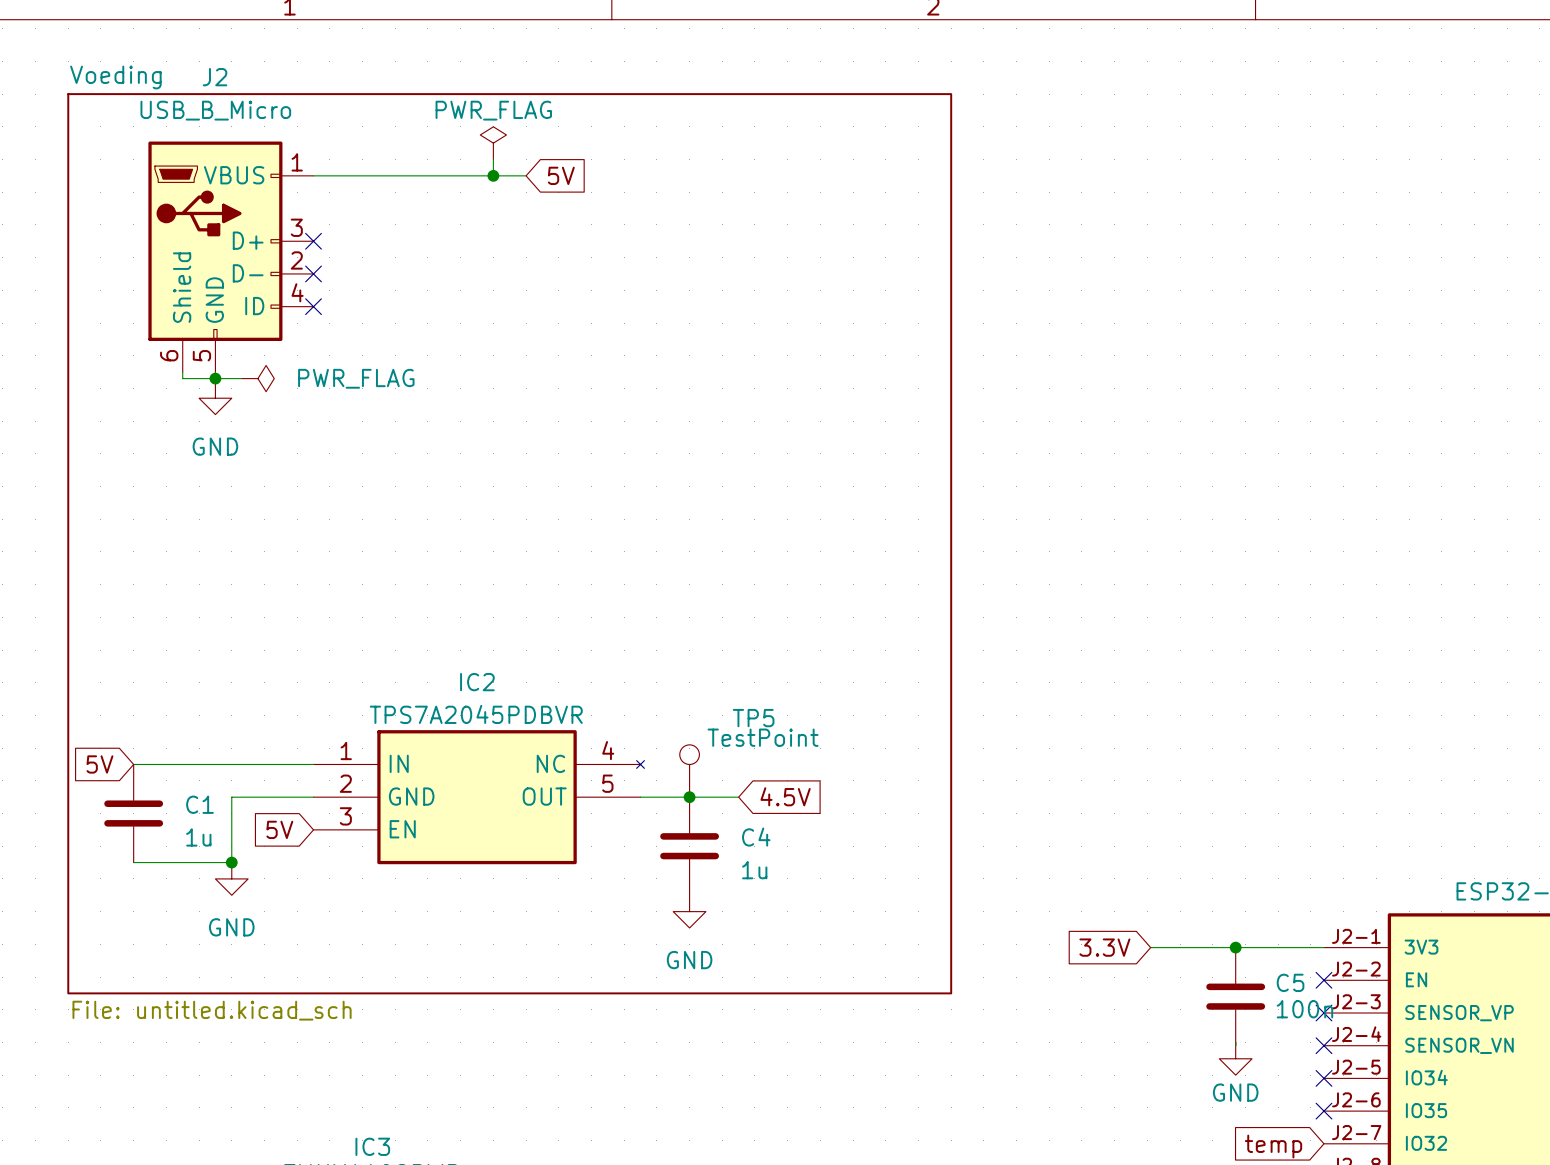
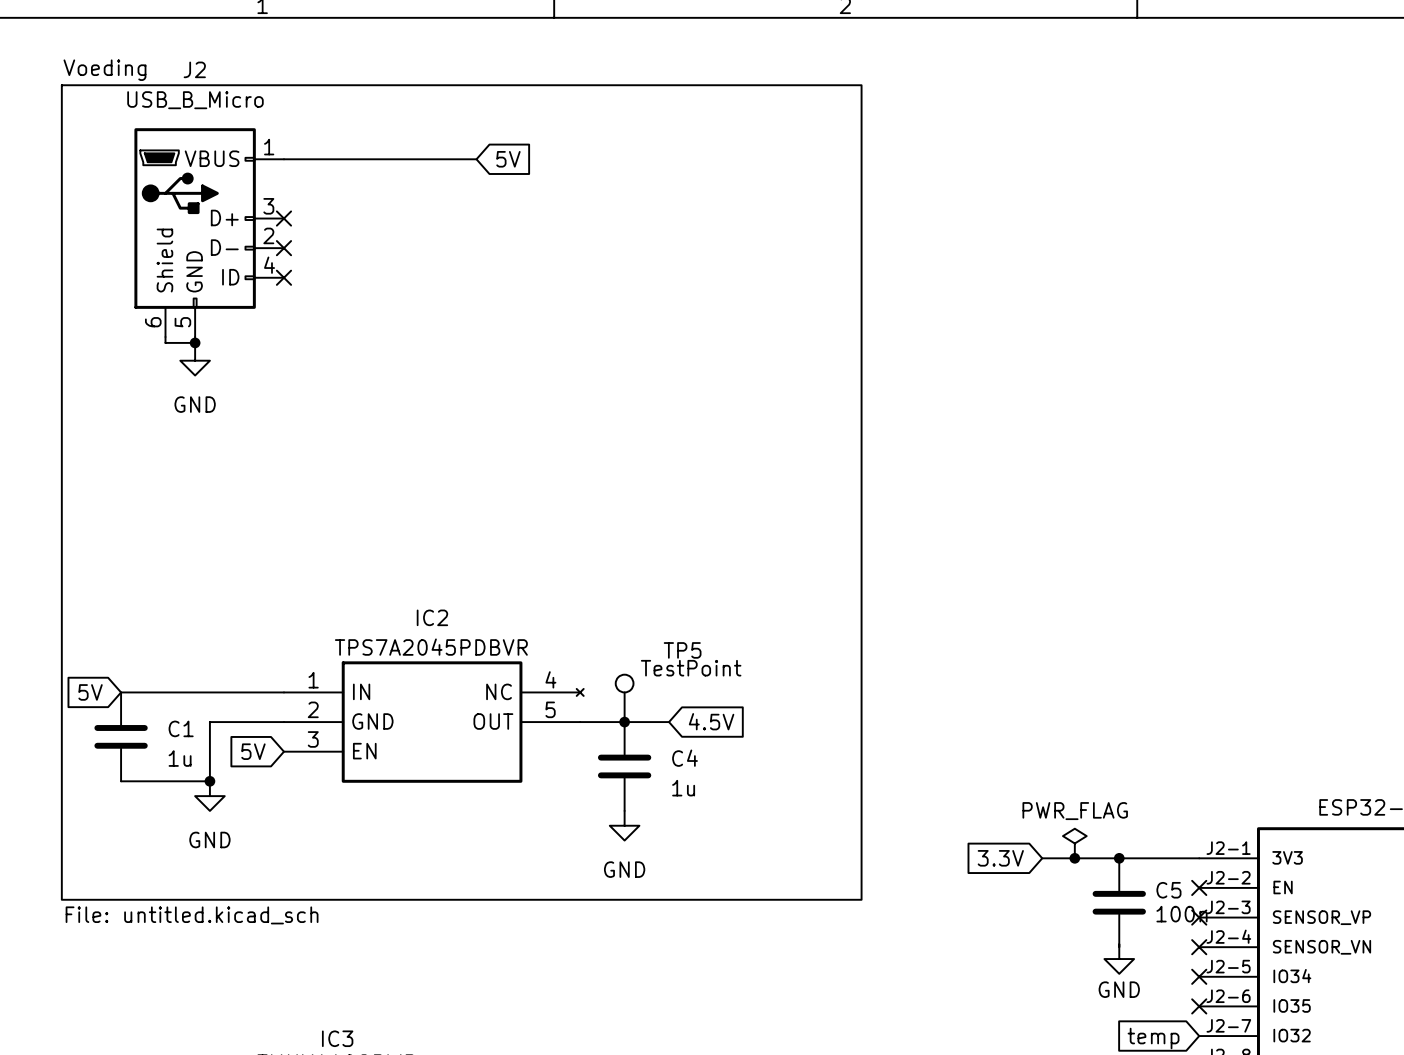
power symbol: PWR_FLAG (493, 143) -> none
wire: (493, 159) (493, 175) -> none
junction: (493, 175) -> none
wire: (215, 378) (241, 378) -> none
power symbol: PWR_FLAG (257, 378) -> none
power symbol: none -> PWR_FLAG (1074, 843)
junction: none -> (1074, 858)

